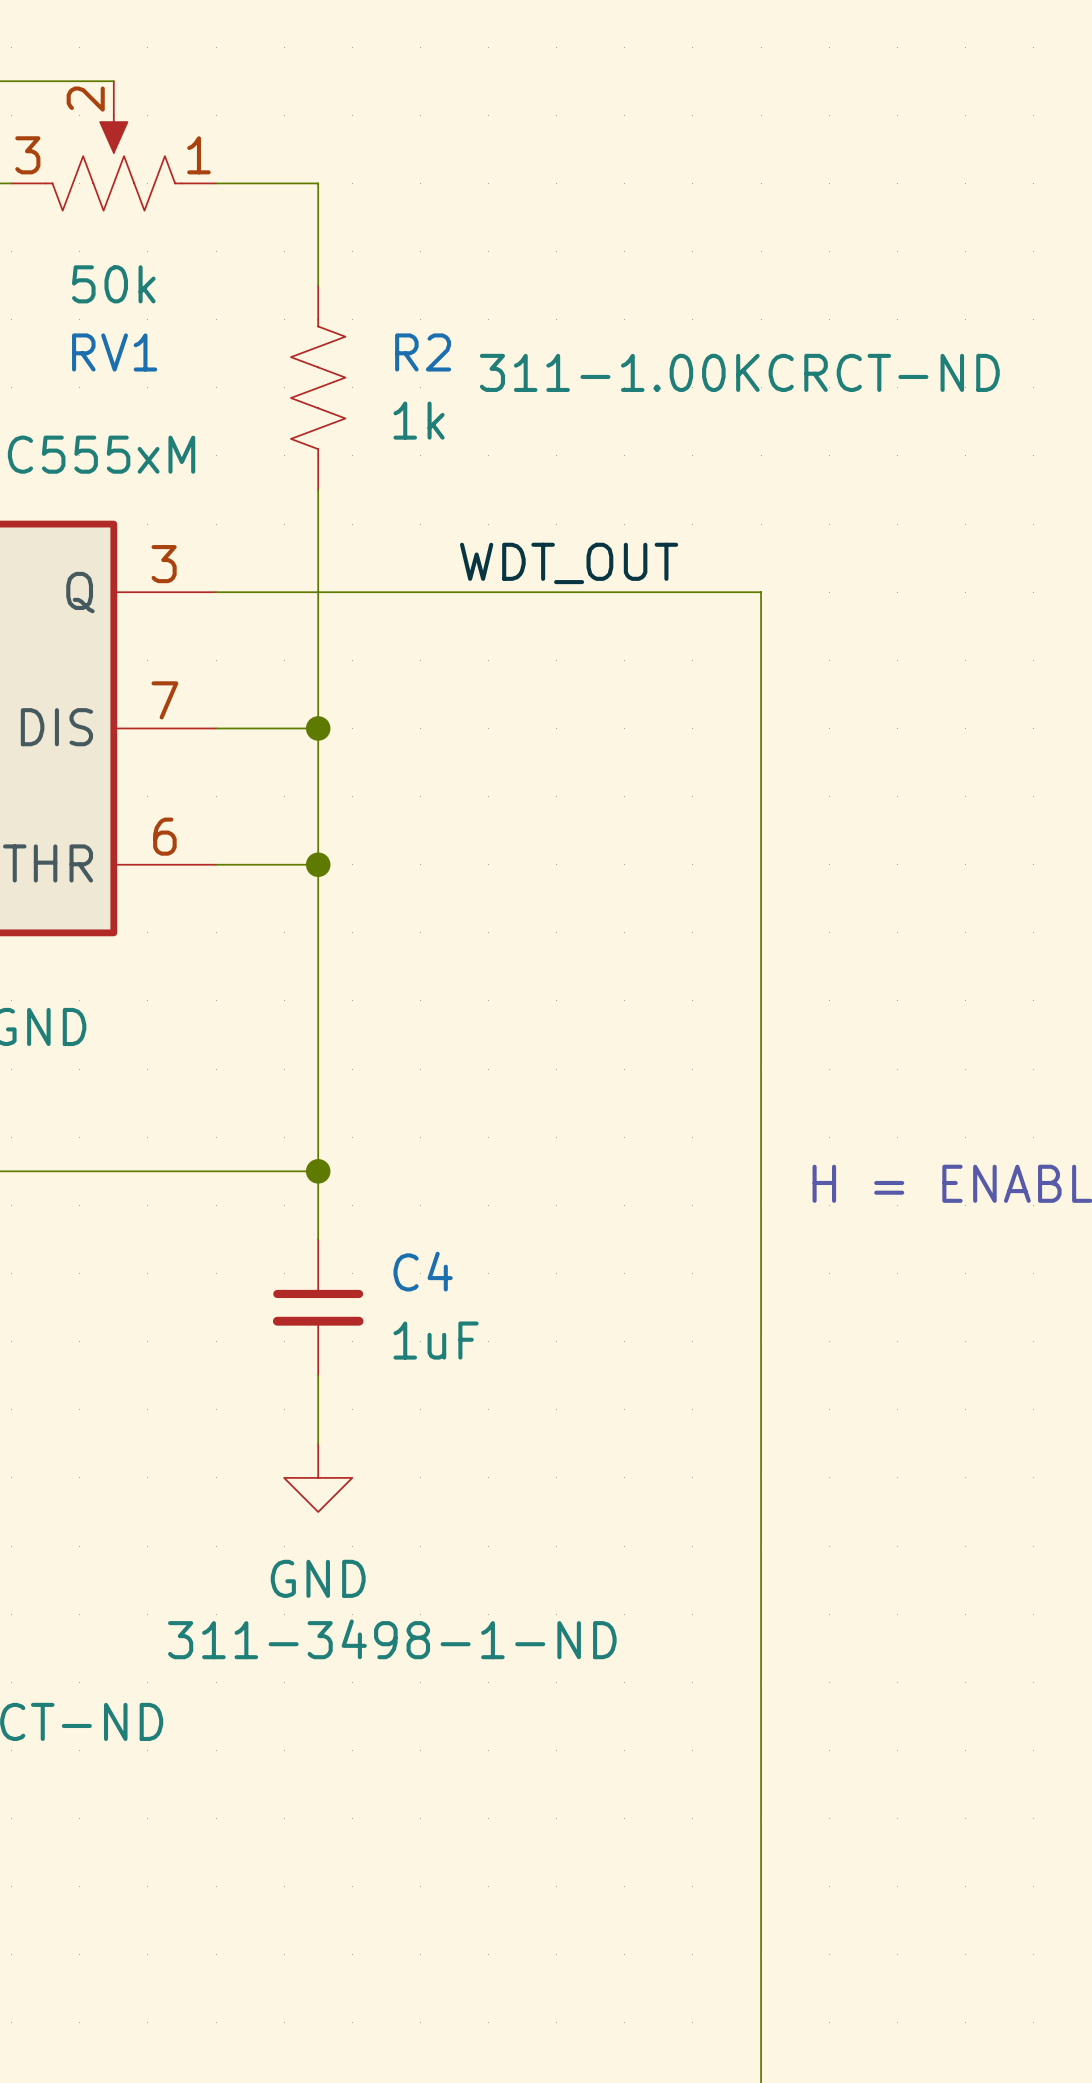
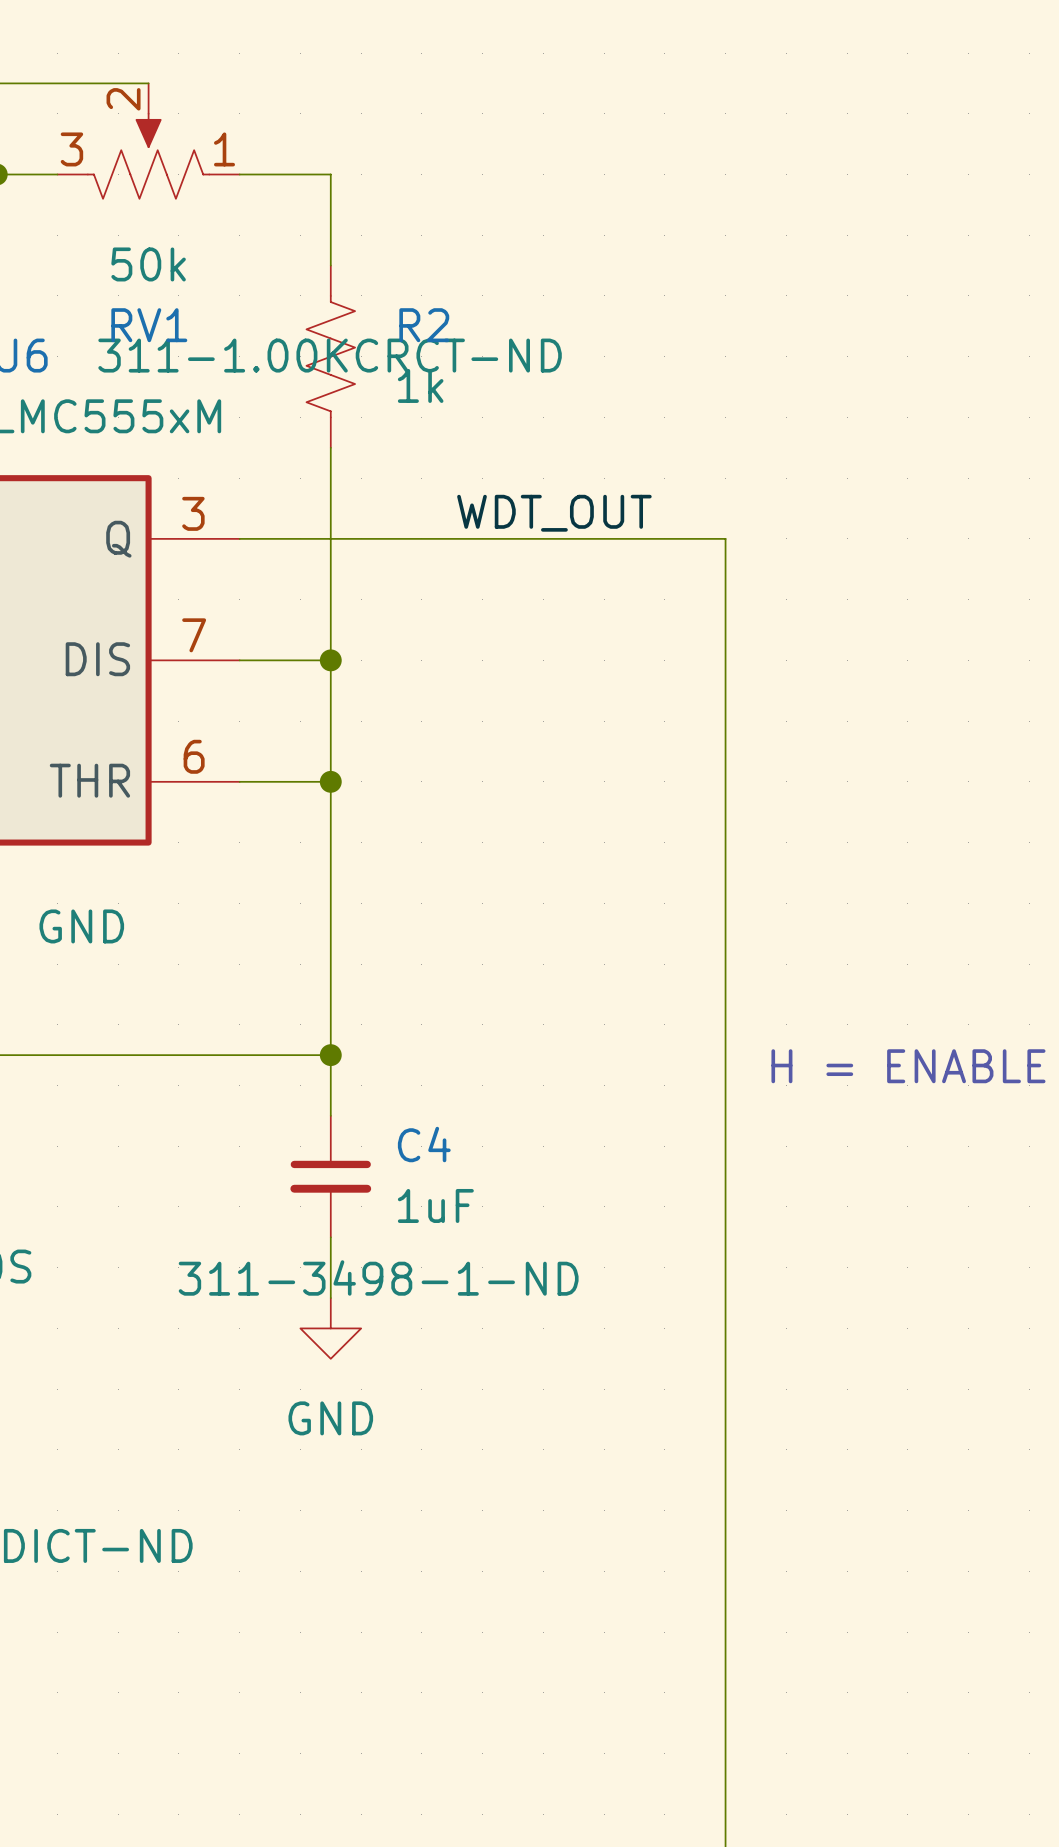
R2 text position: 311-1.00KCRCT-ND (739, 372) -> 311-1.00KCRCT-ND (330, 355)
C4 text position: 311-3498-1-ND (392, 1639) -> 311-3498-1-ND (378, 1277)

